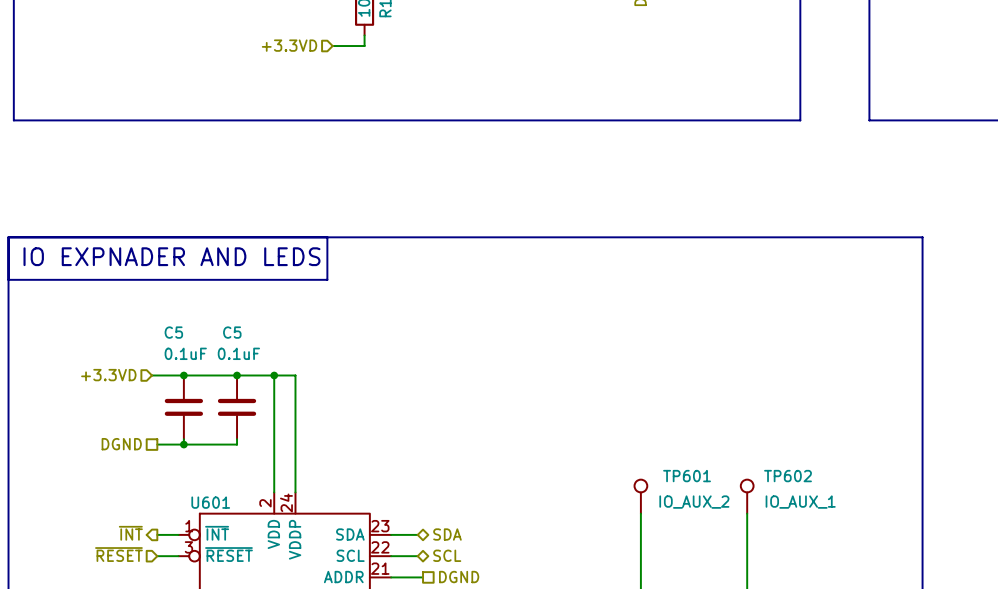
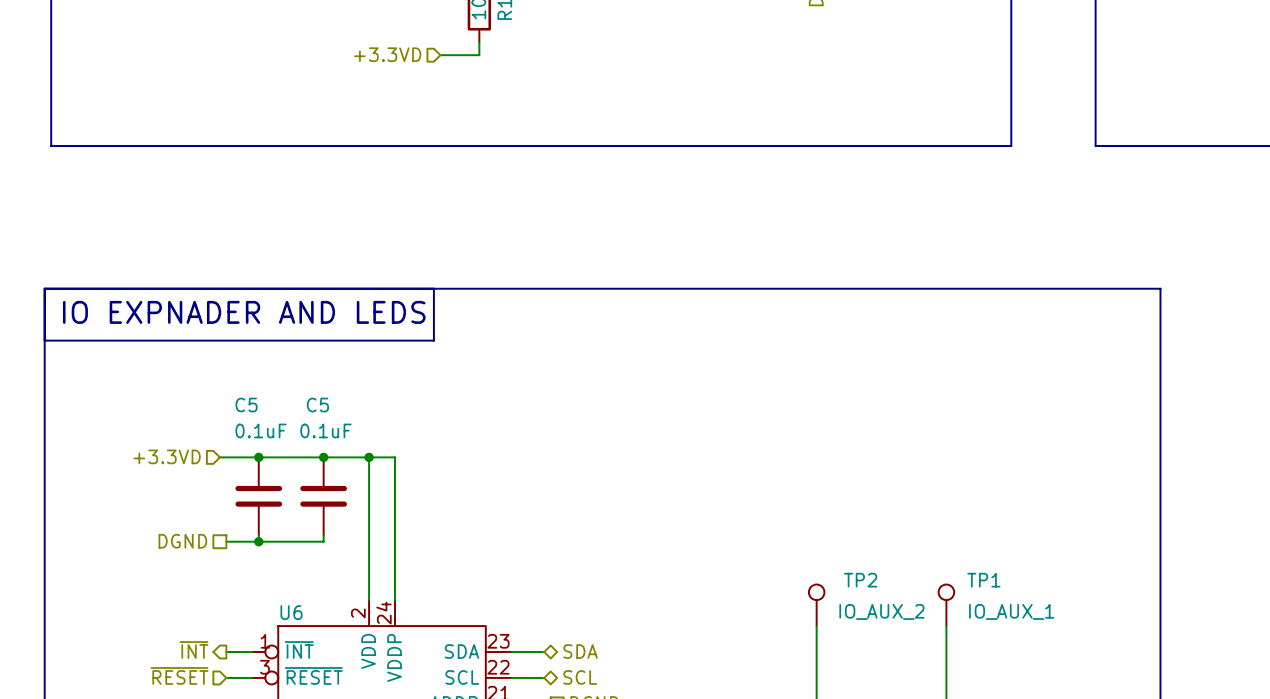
TP601 name: TP601 (687, 476) -> TP2 (860, 580)
TP602 name: TP602 (788, 476) -> TP1 (983, 580)
U601 name: U601 (210, 502) -> U6 (291, 612)

